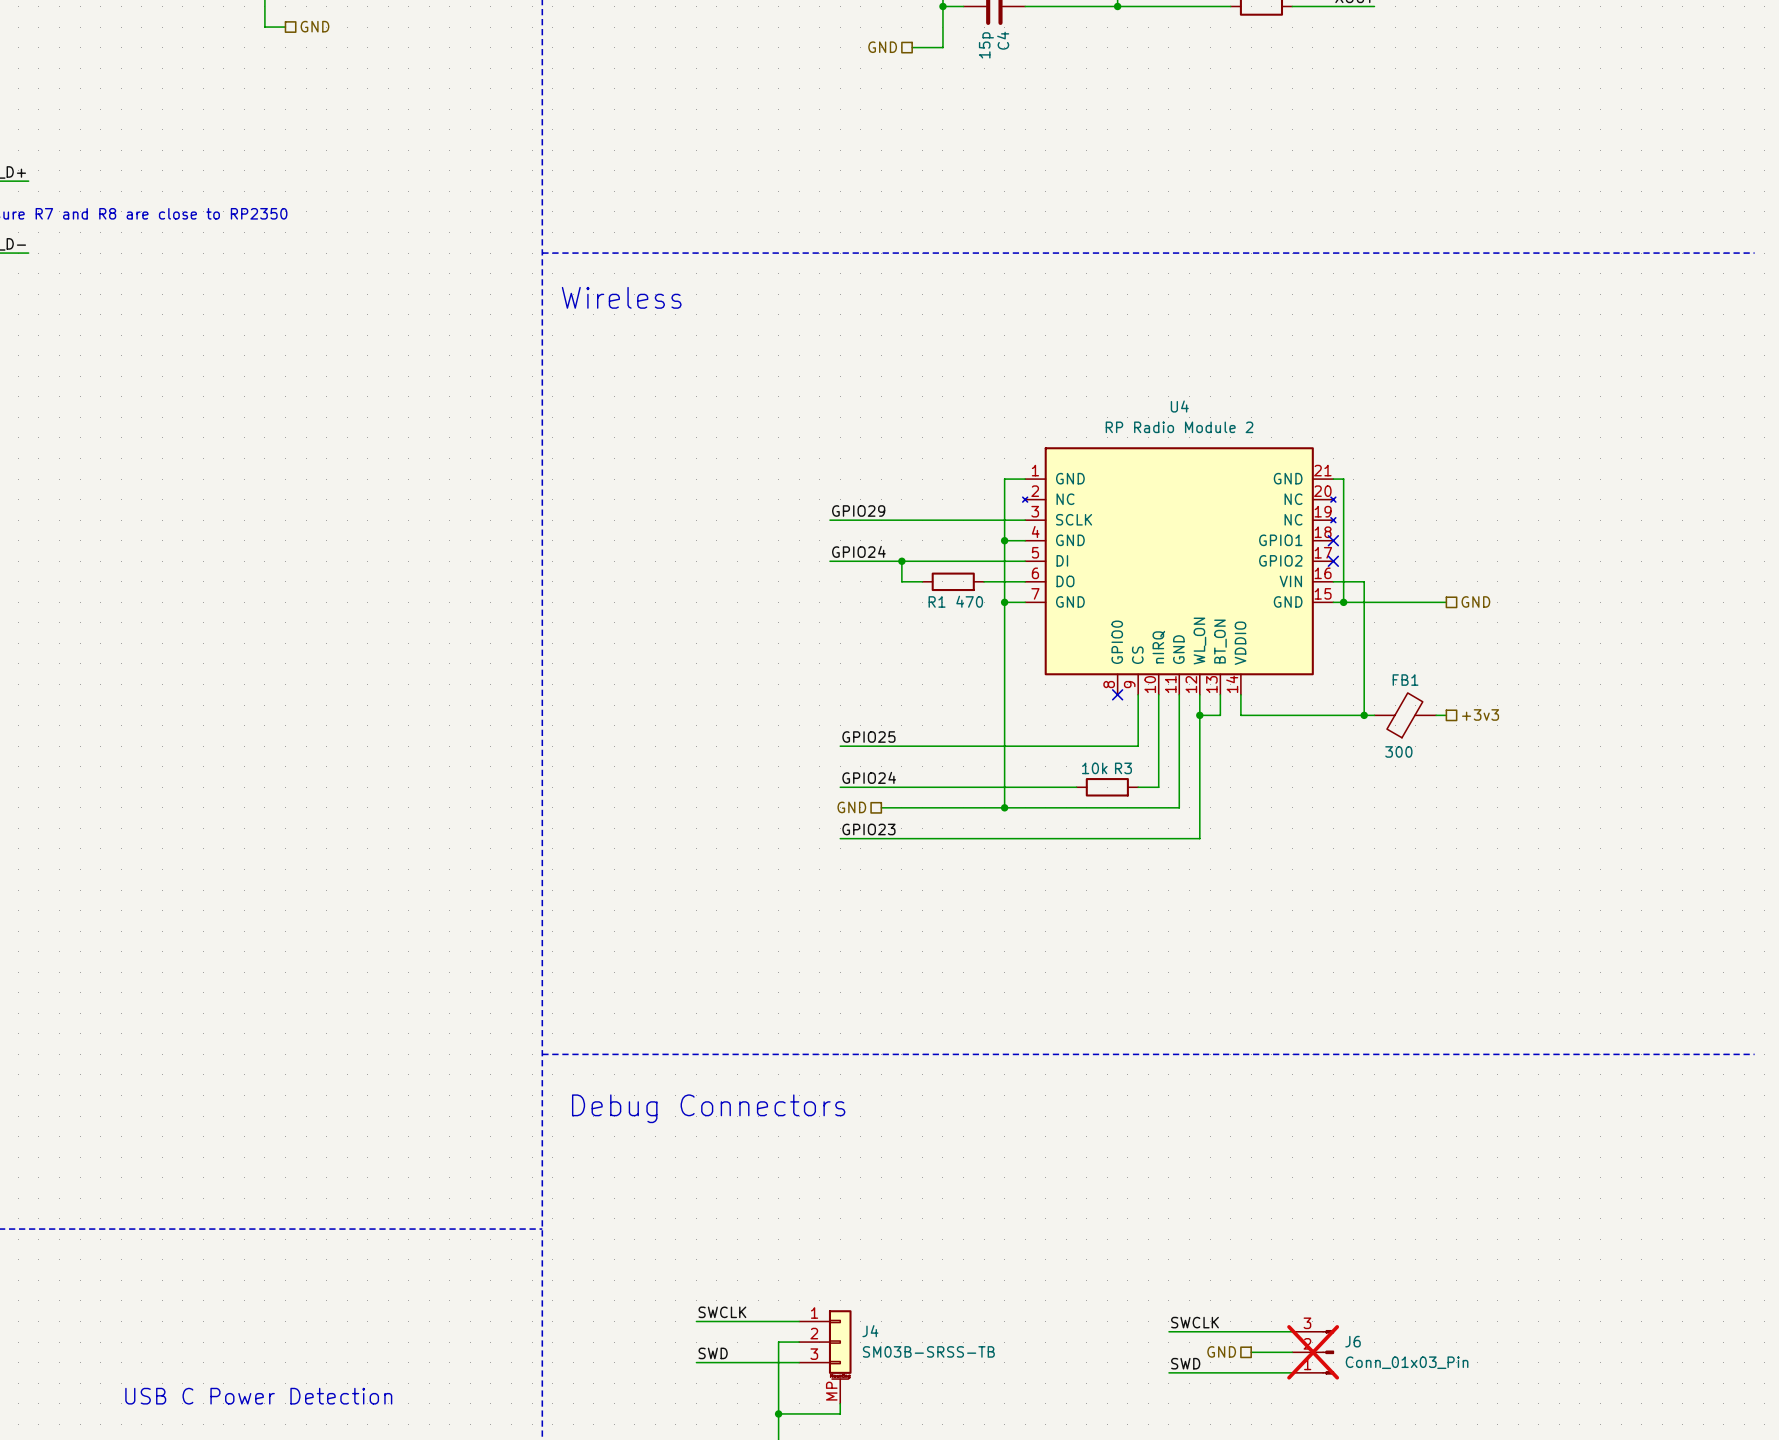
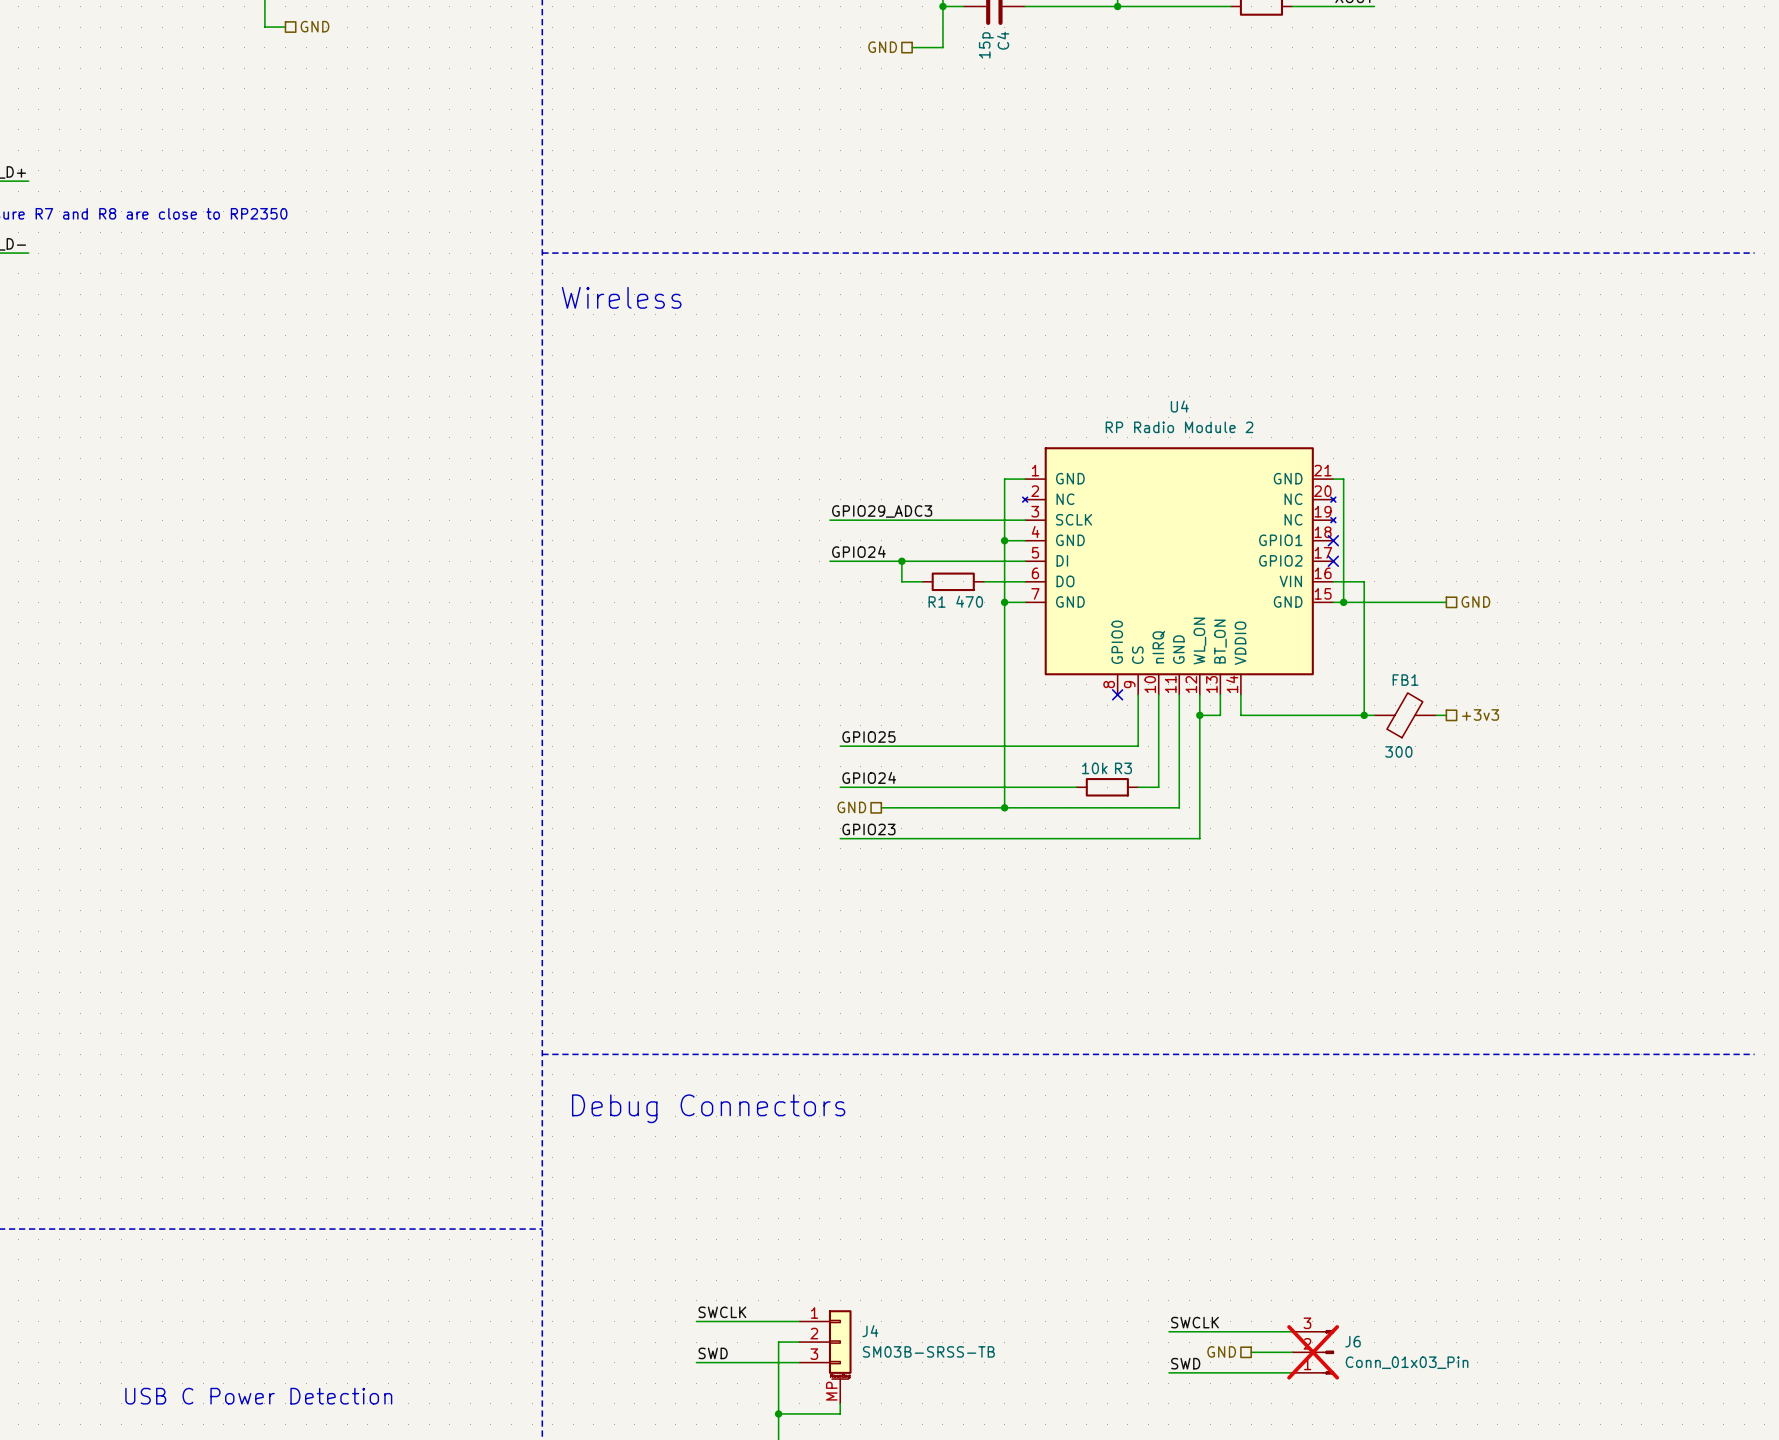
label: GPIO29 (858, 511) -> GPIO29_ADC3 (882, 511)

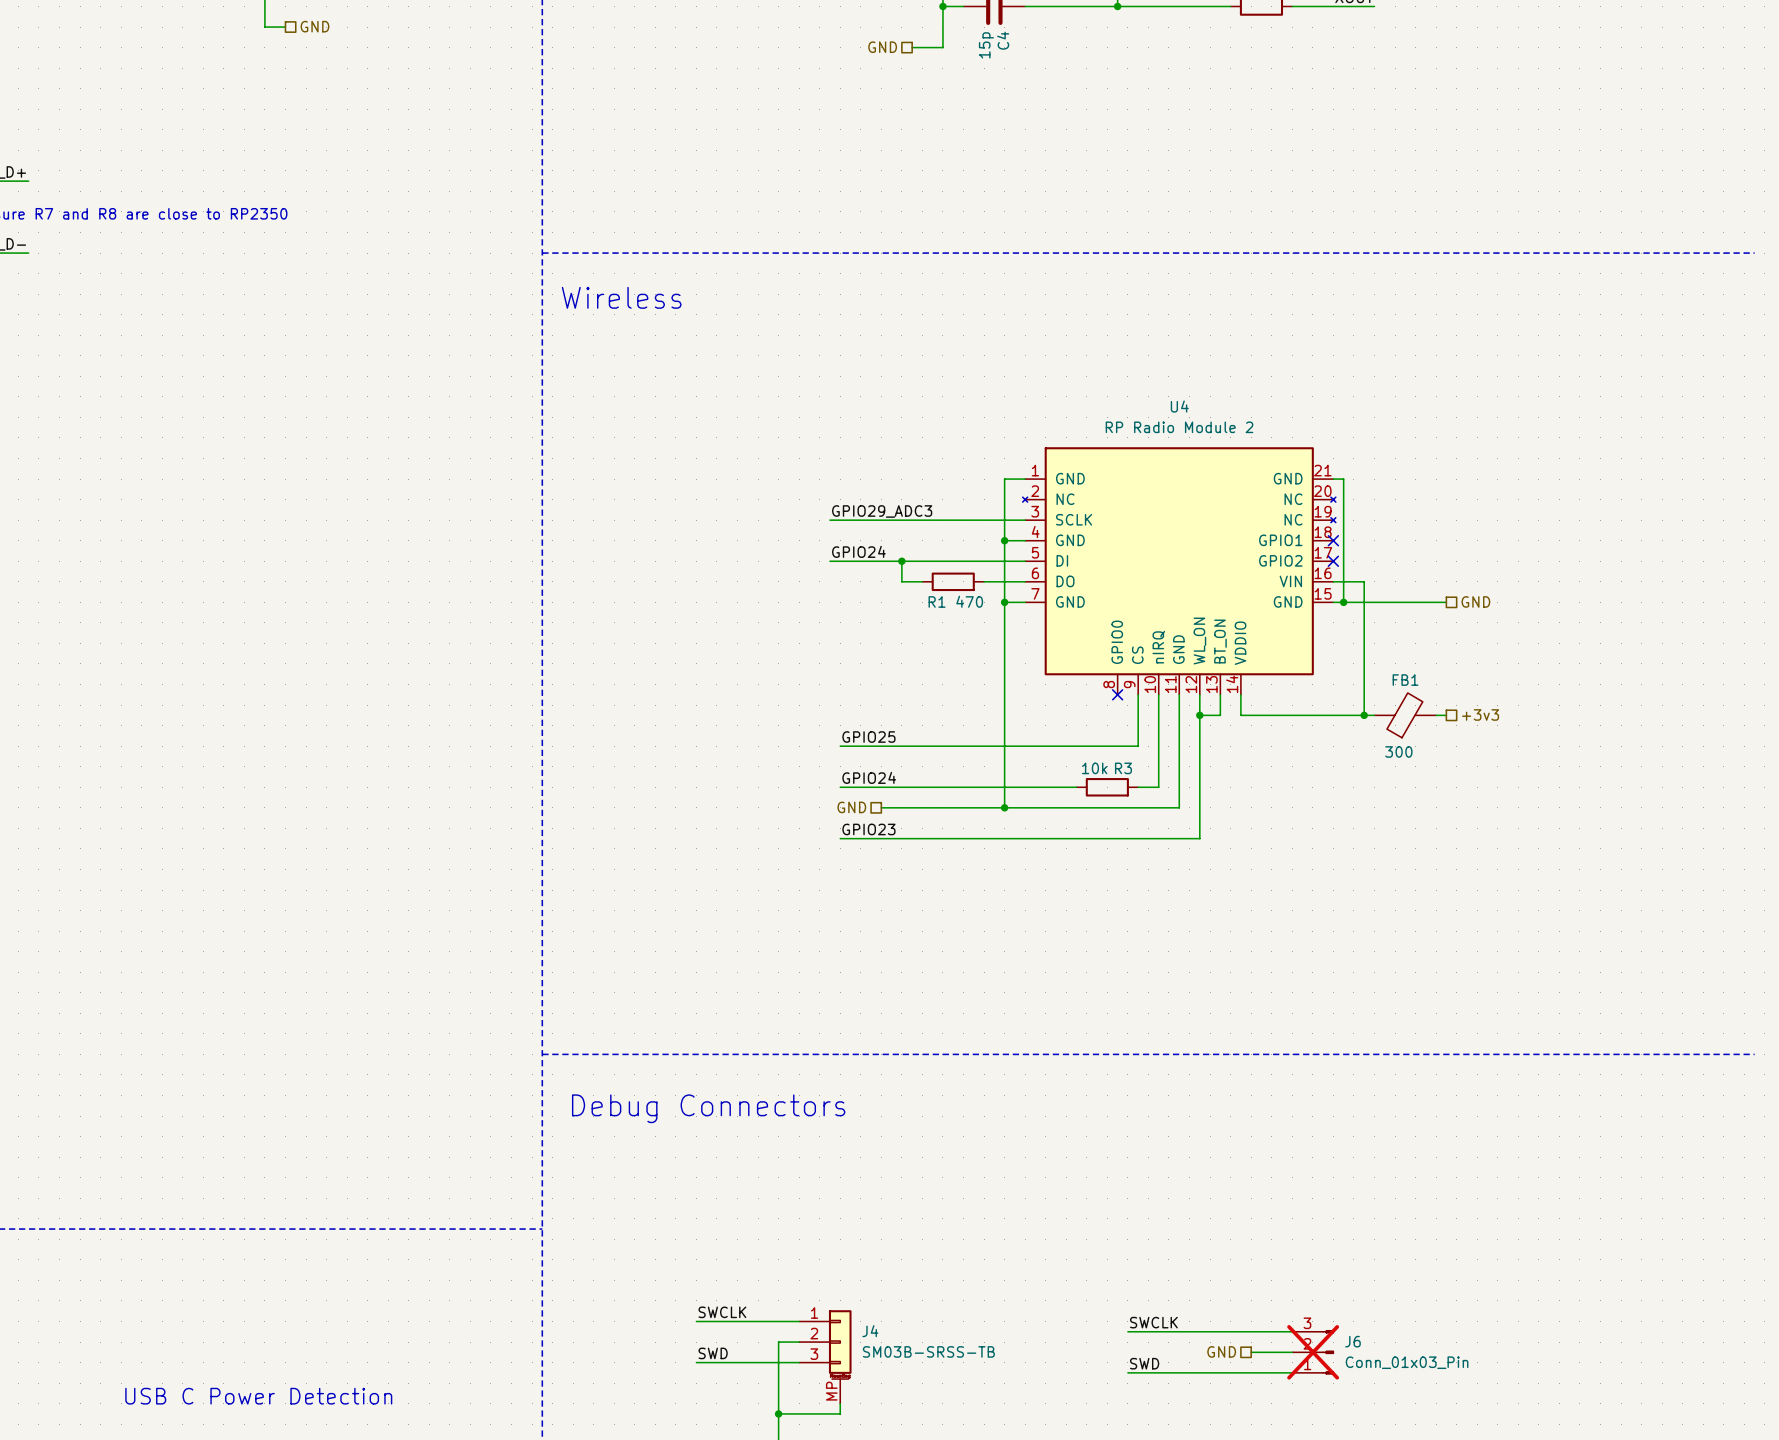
label position: SWCLK (1195, 1322) -> SWCLK (1153, 1322)
wire: none -> (1127, 1331) (1168, 1331)
label position: SWD (1185, 1363) -> SWD (1144, 1363)
wire: none -> (1127, 1372) (1168, 1372)

